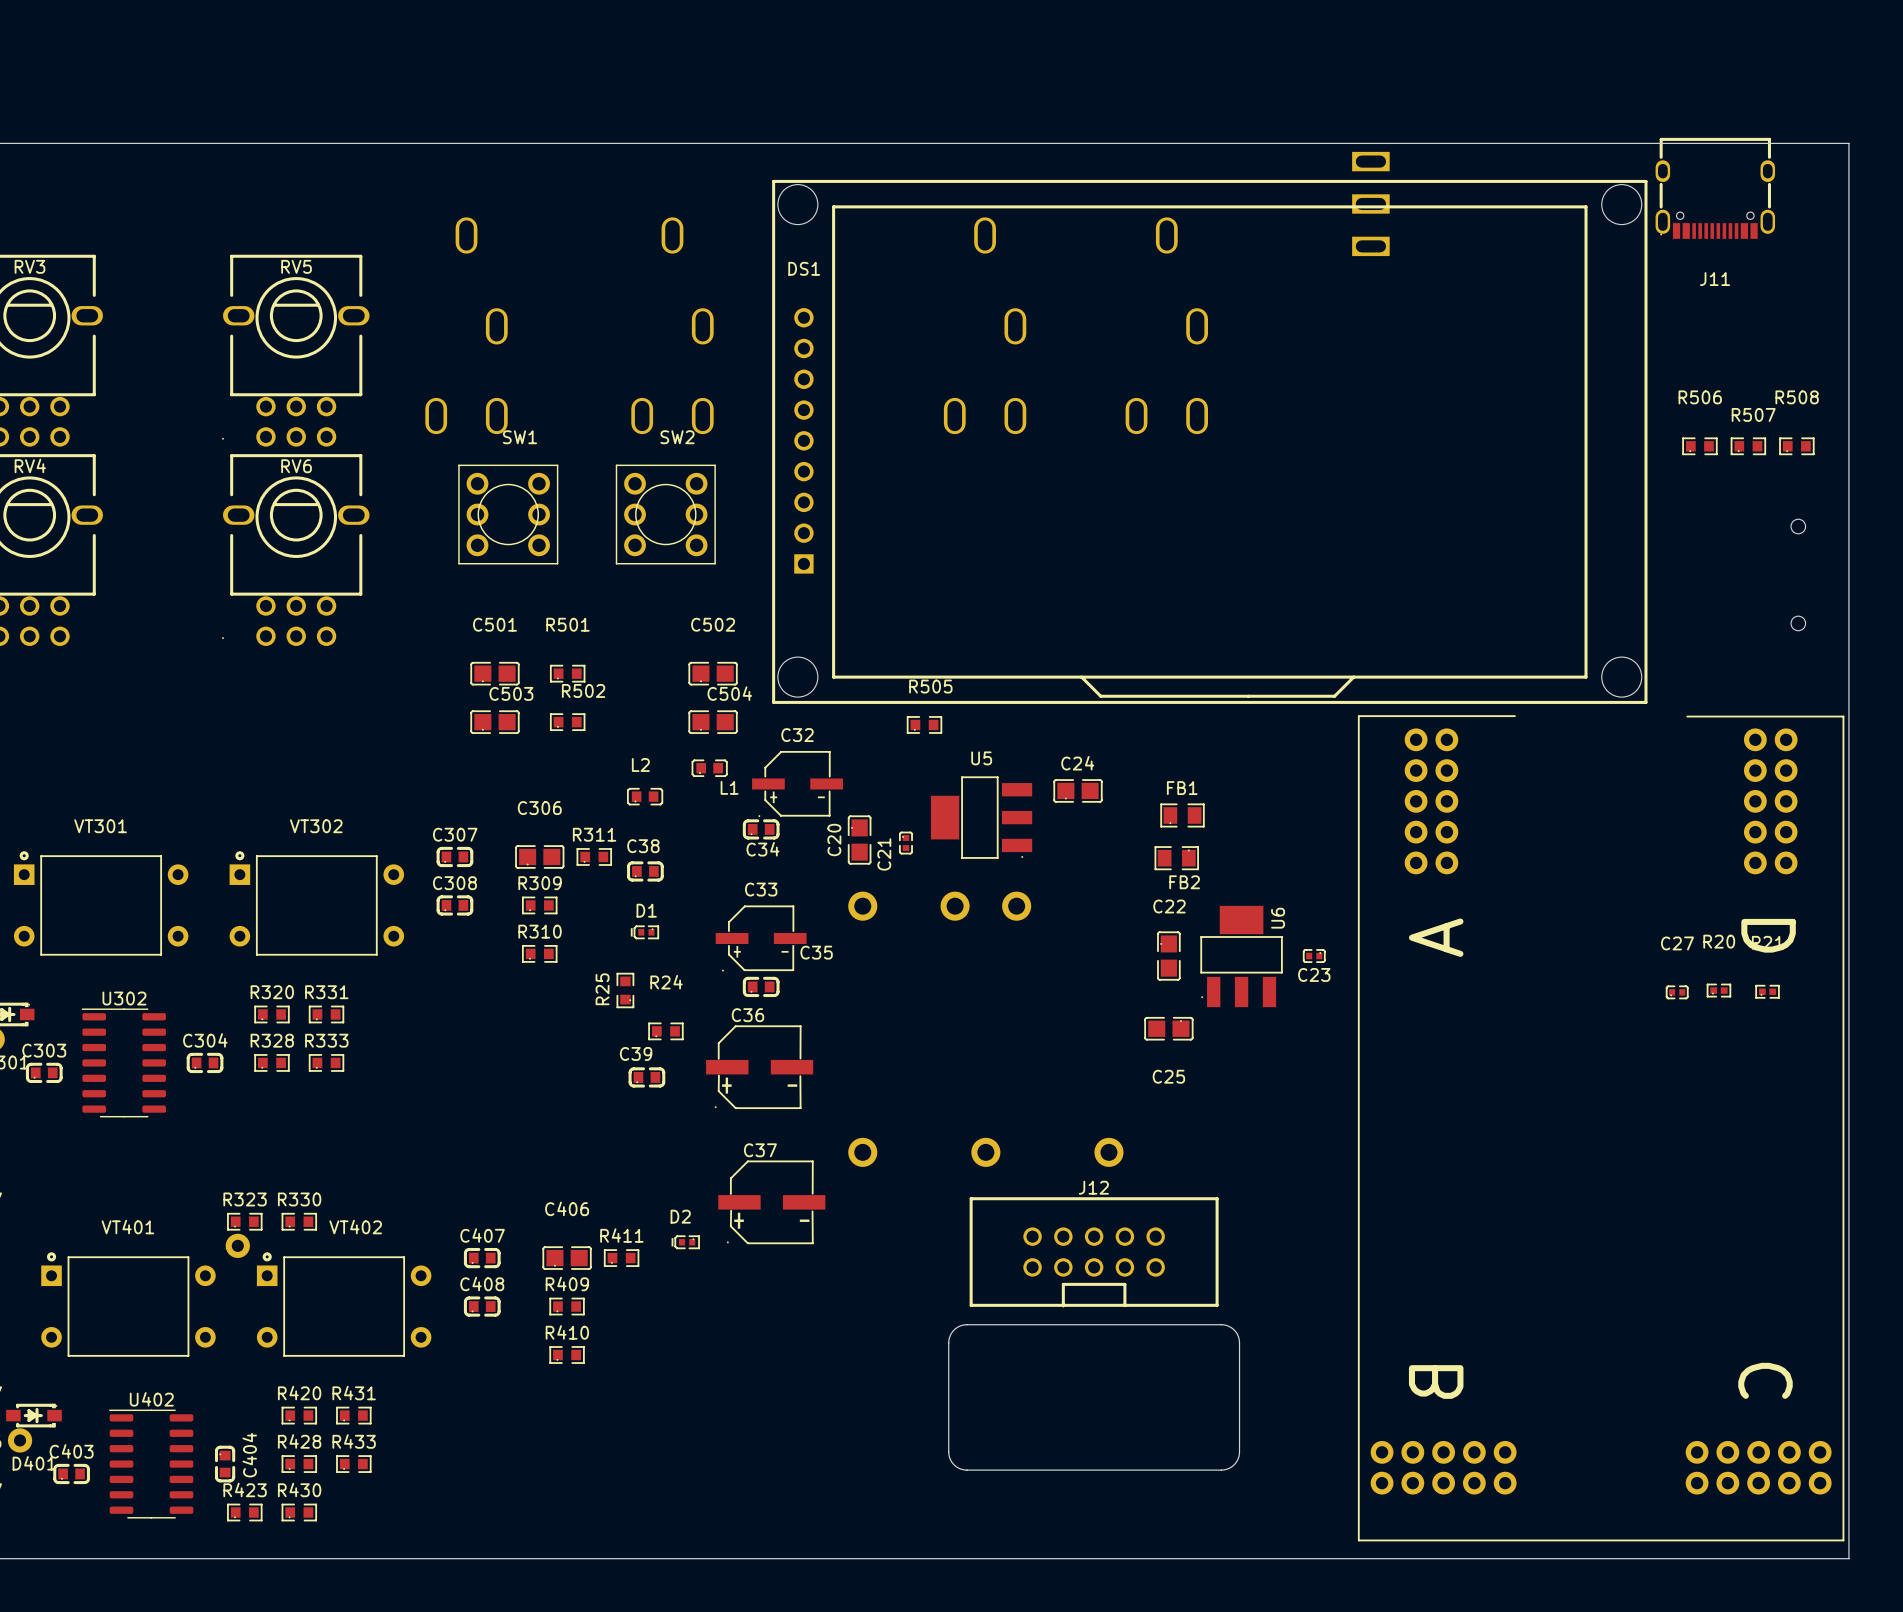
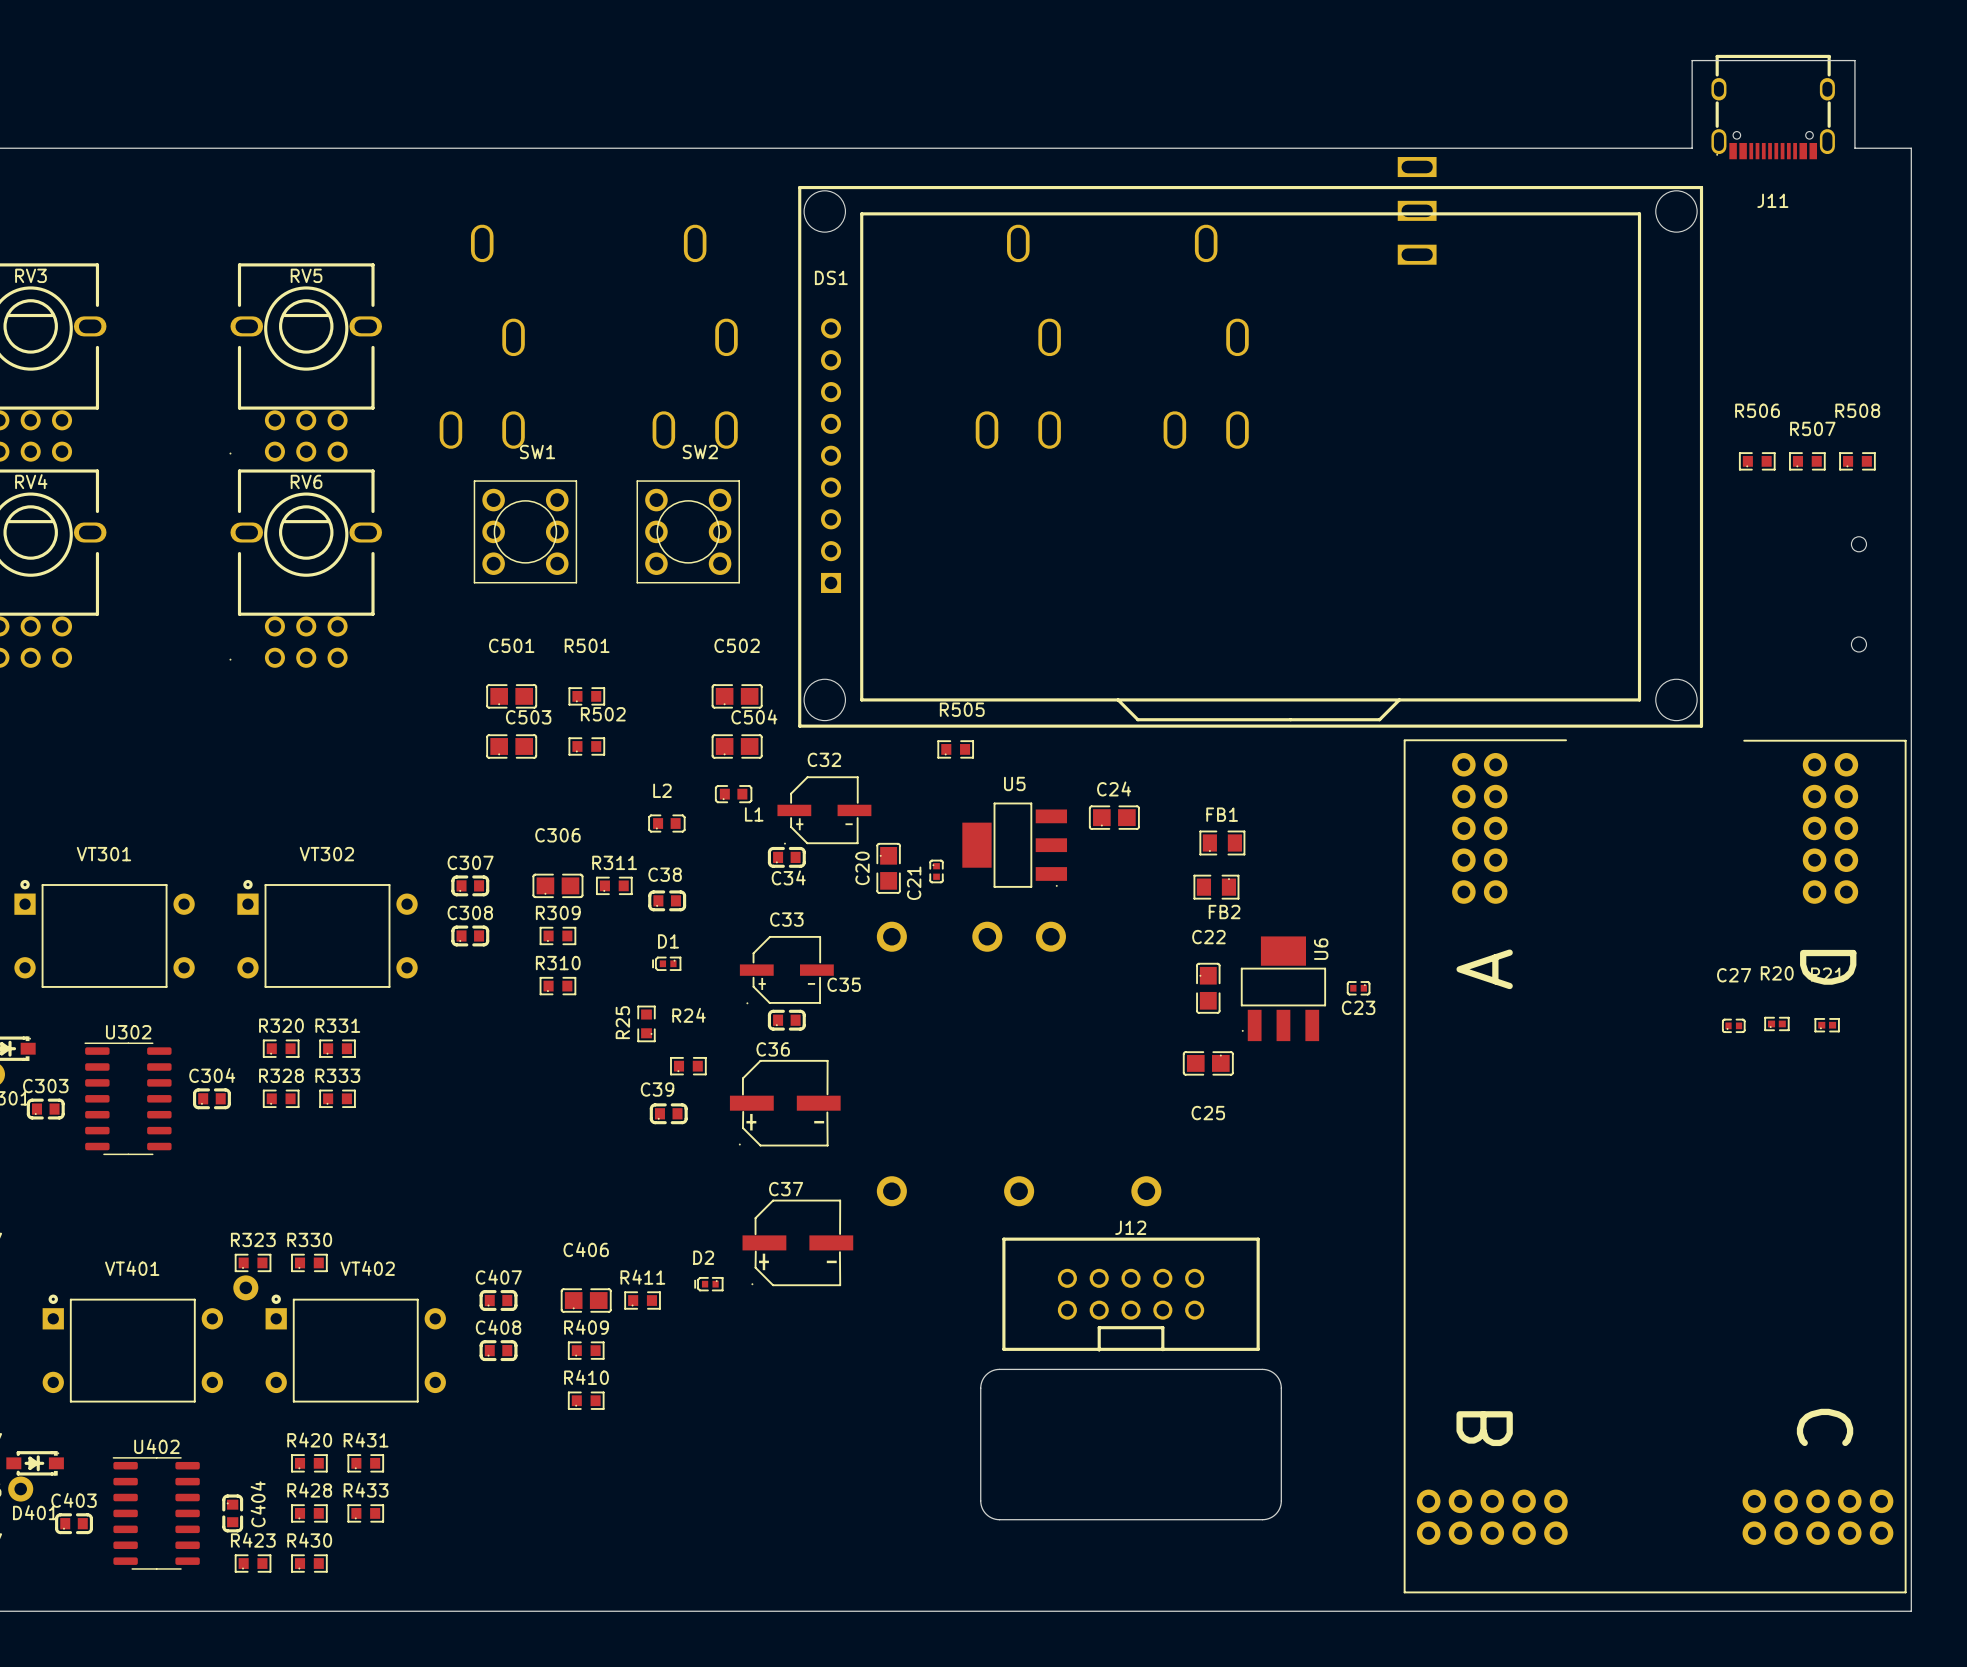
board edge: (1636, 143) (1794, 143) -> (1692, 148) (1692, 60) (1854, 60) (1854, 148)
J11 position: (1715, 188) -> (1773, 107)

